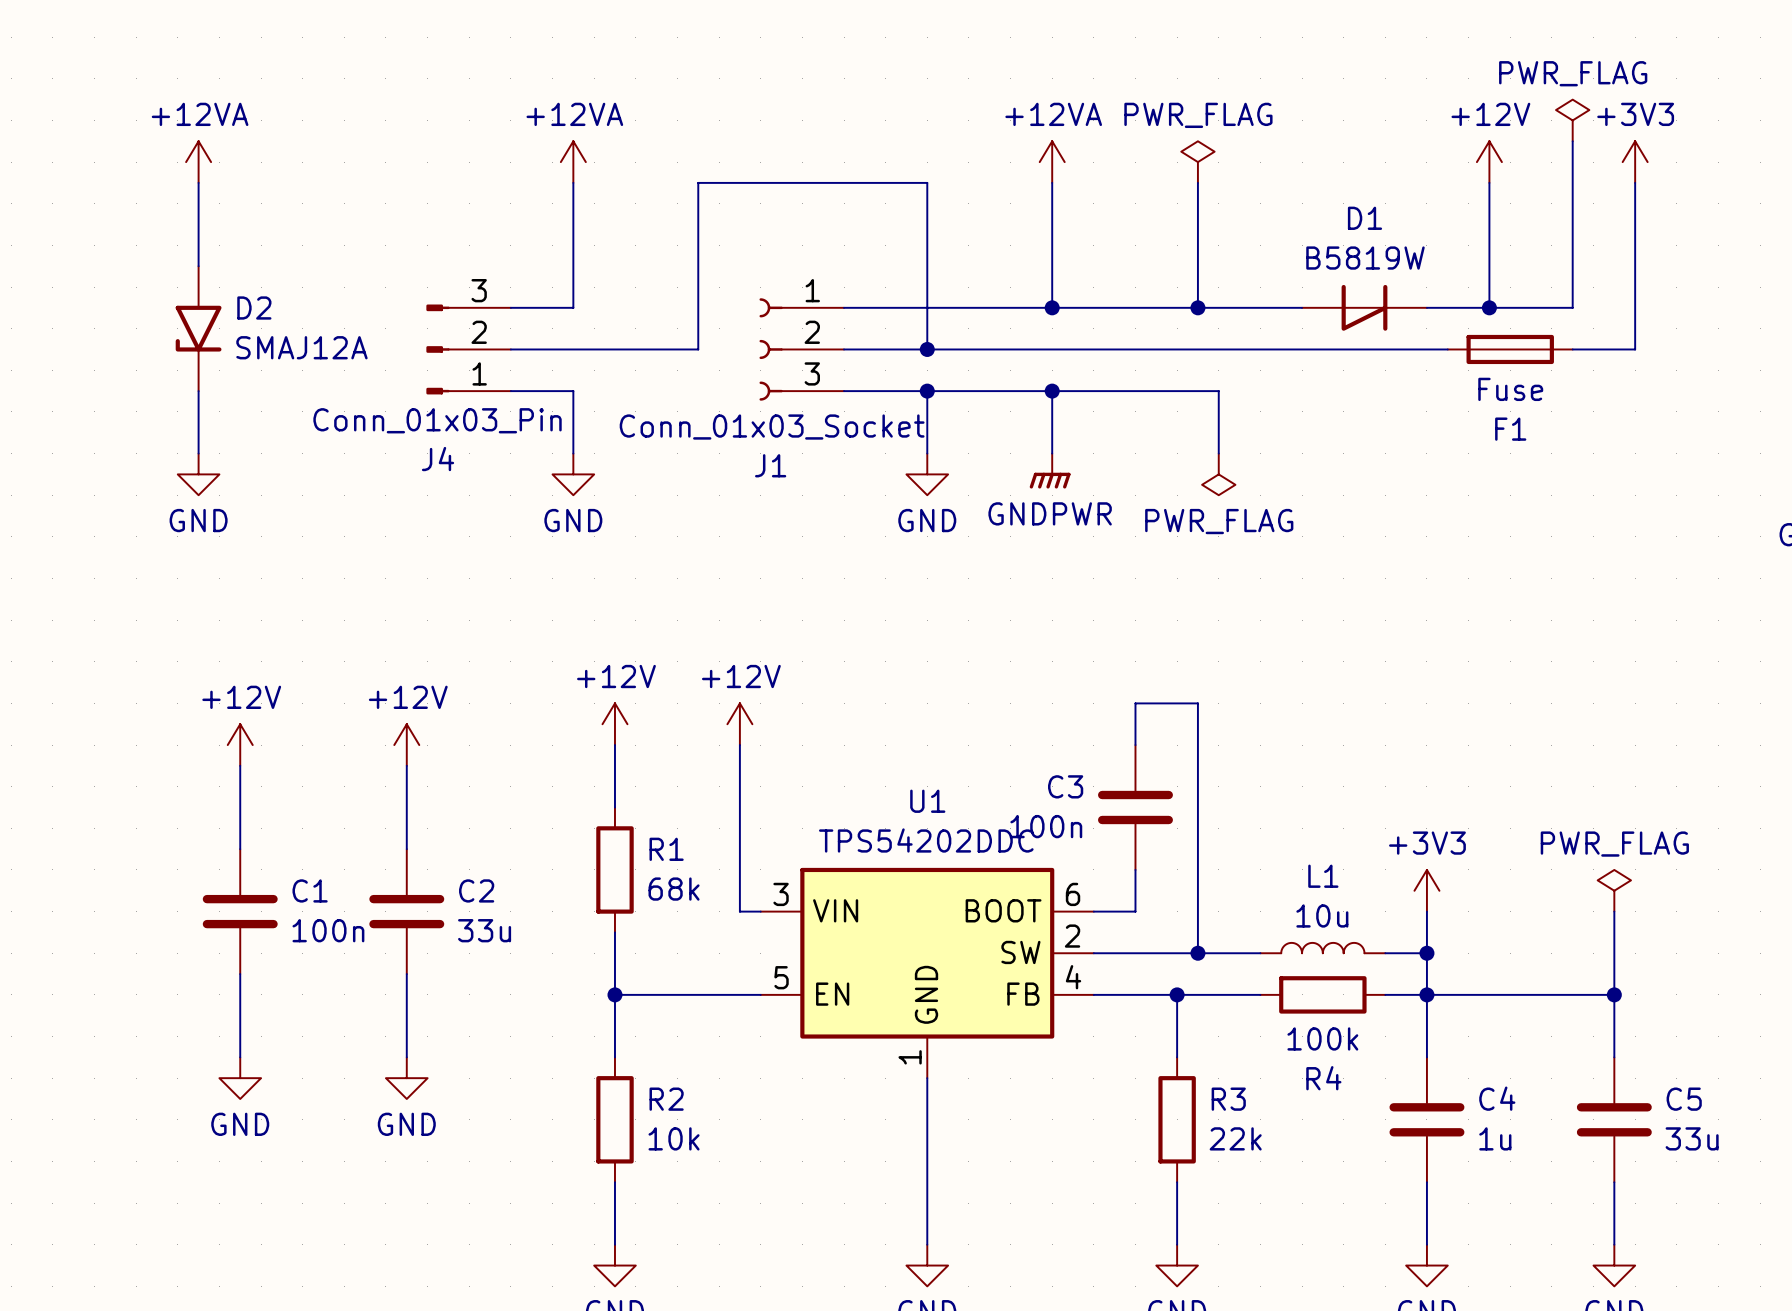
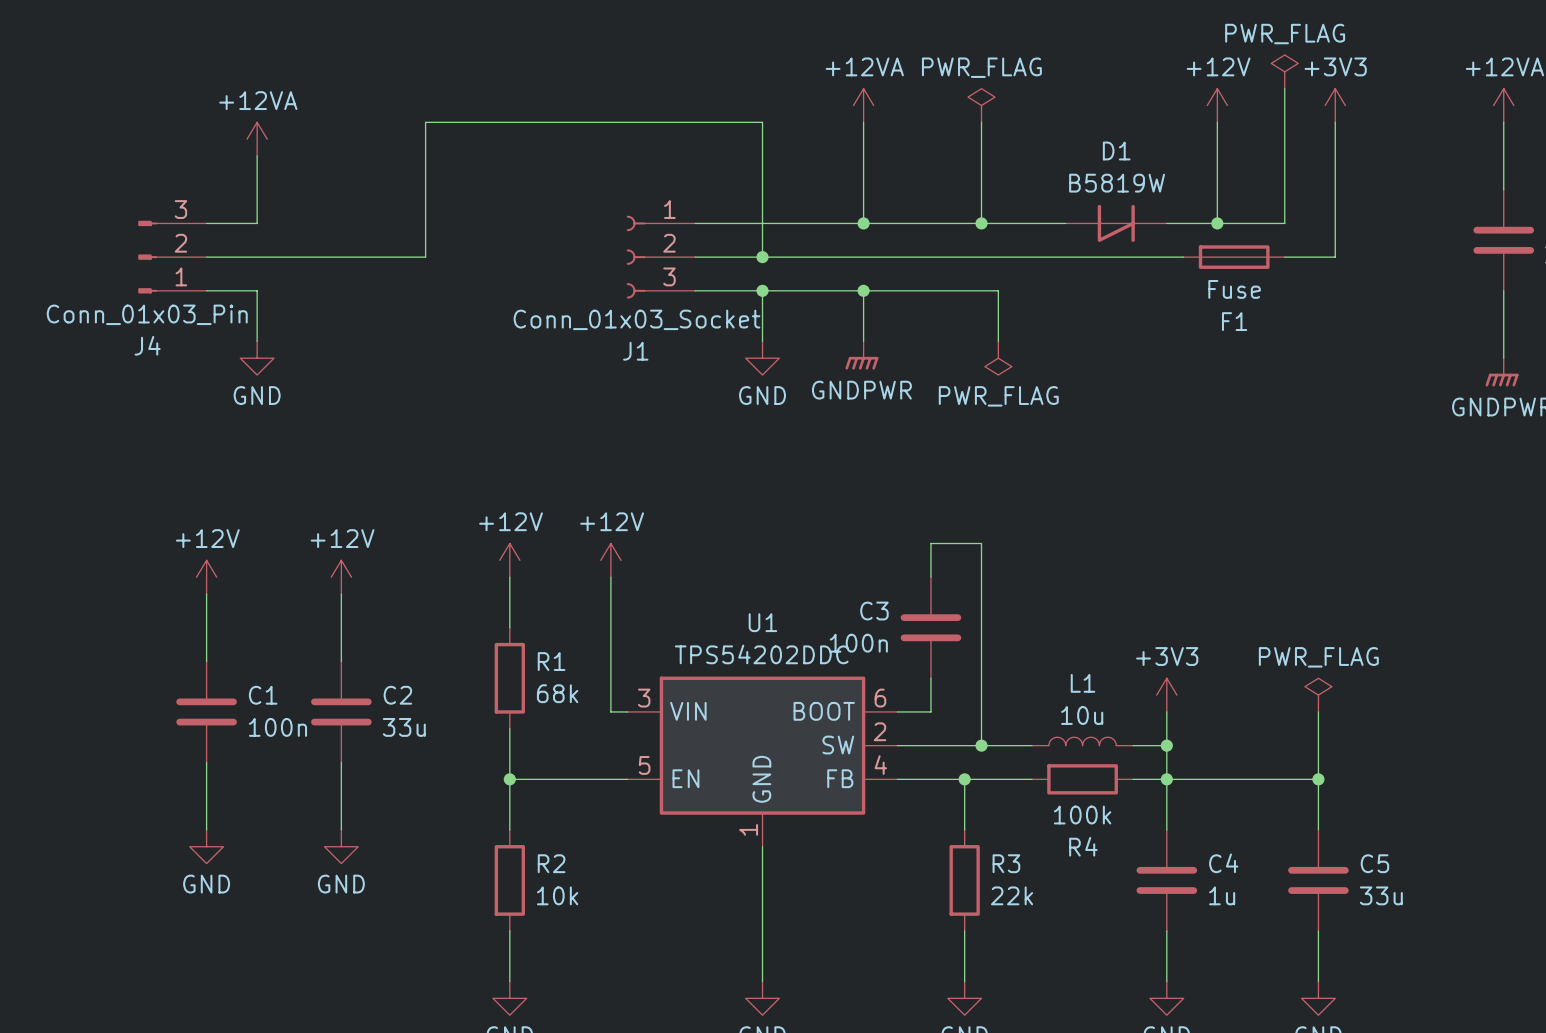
power symbol position: +12VA (198, 162) -> +12VA (257, 139)
power symbol: +12VA (573, 162) -> none
wire: (198, 182) (198, 266) -> none
wire: (573, 182) (573, 307) (510, 307) -> none
wire: (698, 182) (698, 349) (510, 349) -> (577, 122) (425, 122) (425, 257) (206, 257)
wire: none -> (257, 156) (257, 223) (206, 223)
D2: SMAJ12A (198, 328) -> none
J4 position: (468, 349) -> (172, 257)
wire: (198, 391) (198, 453) -> none
wire: (510, 391) (573, 391) (573, 453) -> (206, 290) (257, 290) (257, 341)
power symbol position: GND (198, 474) -> GND (257, 358)
power symbol: GND (573, 474) -> none

